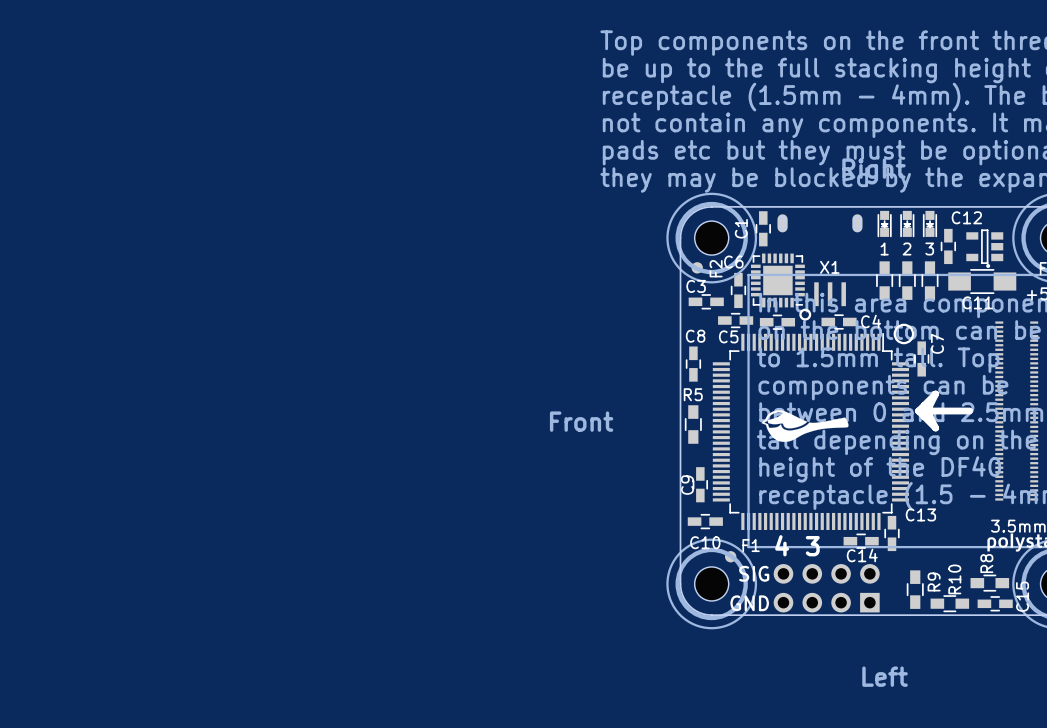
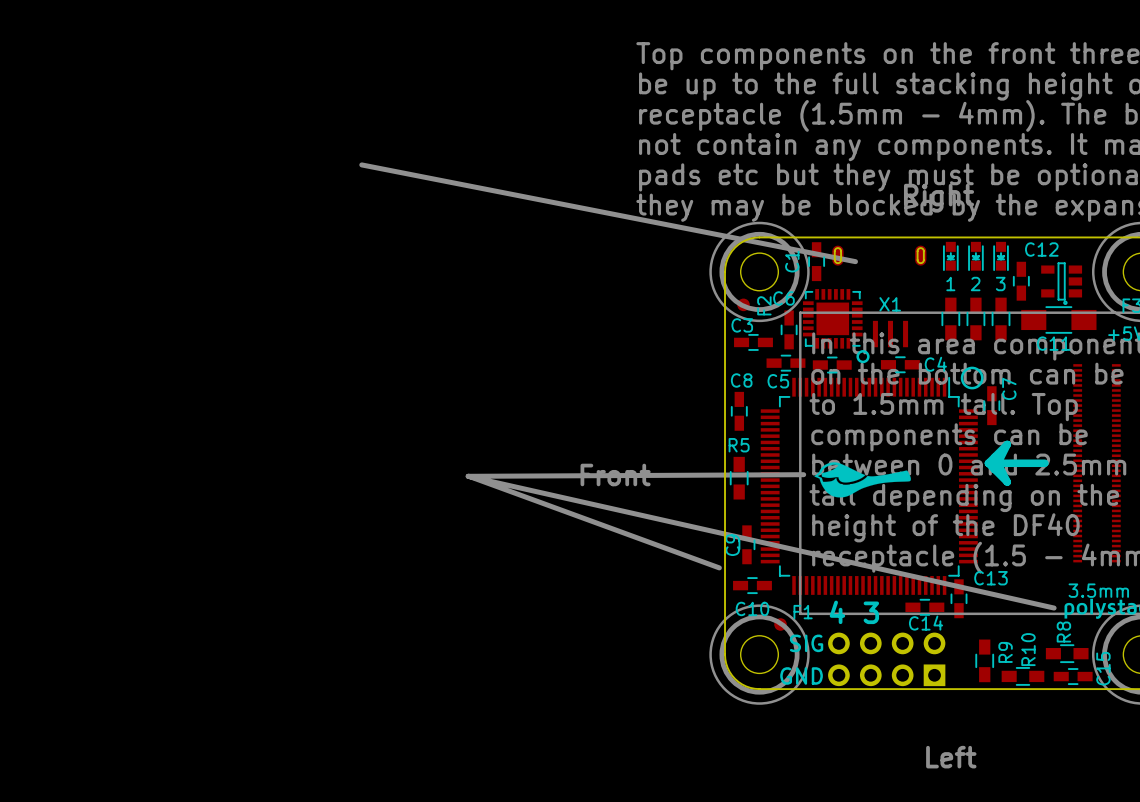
line: none -> (361, 164) (855, 261)
line: none -> (803, 474) (468, 476) (1054, 608)
line: none -> (468, 476) (719, 567)

